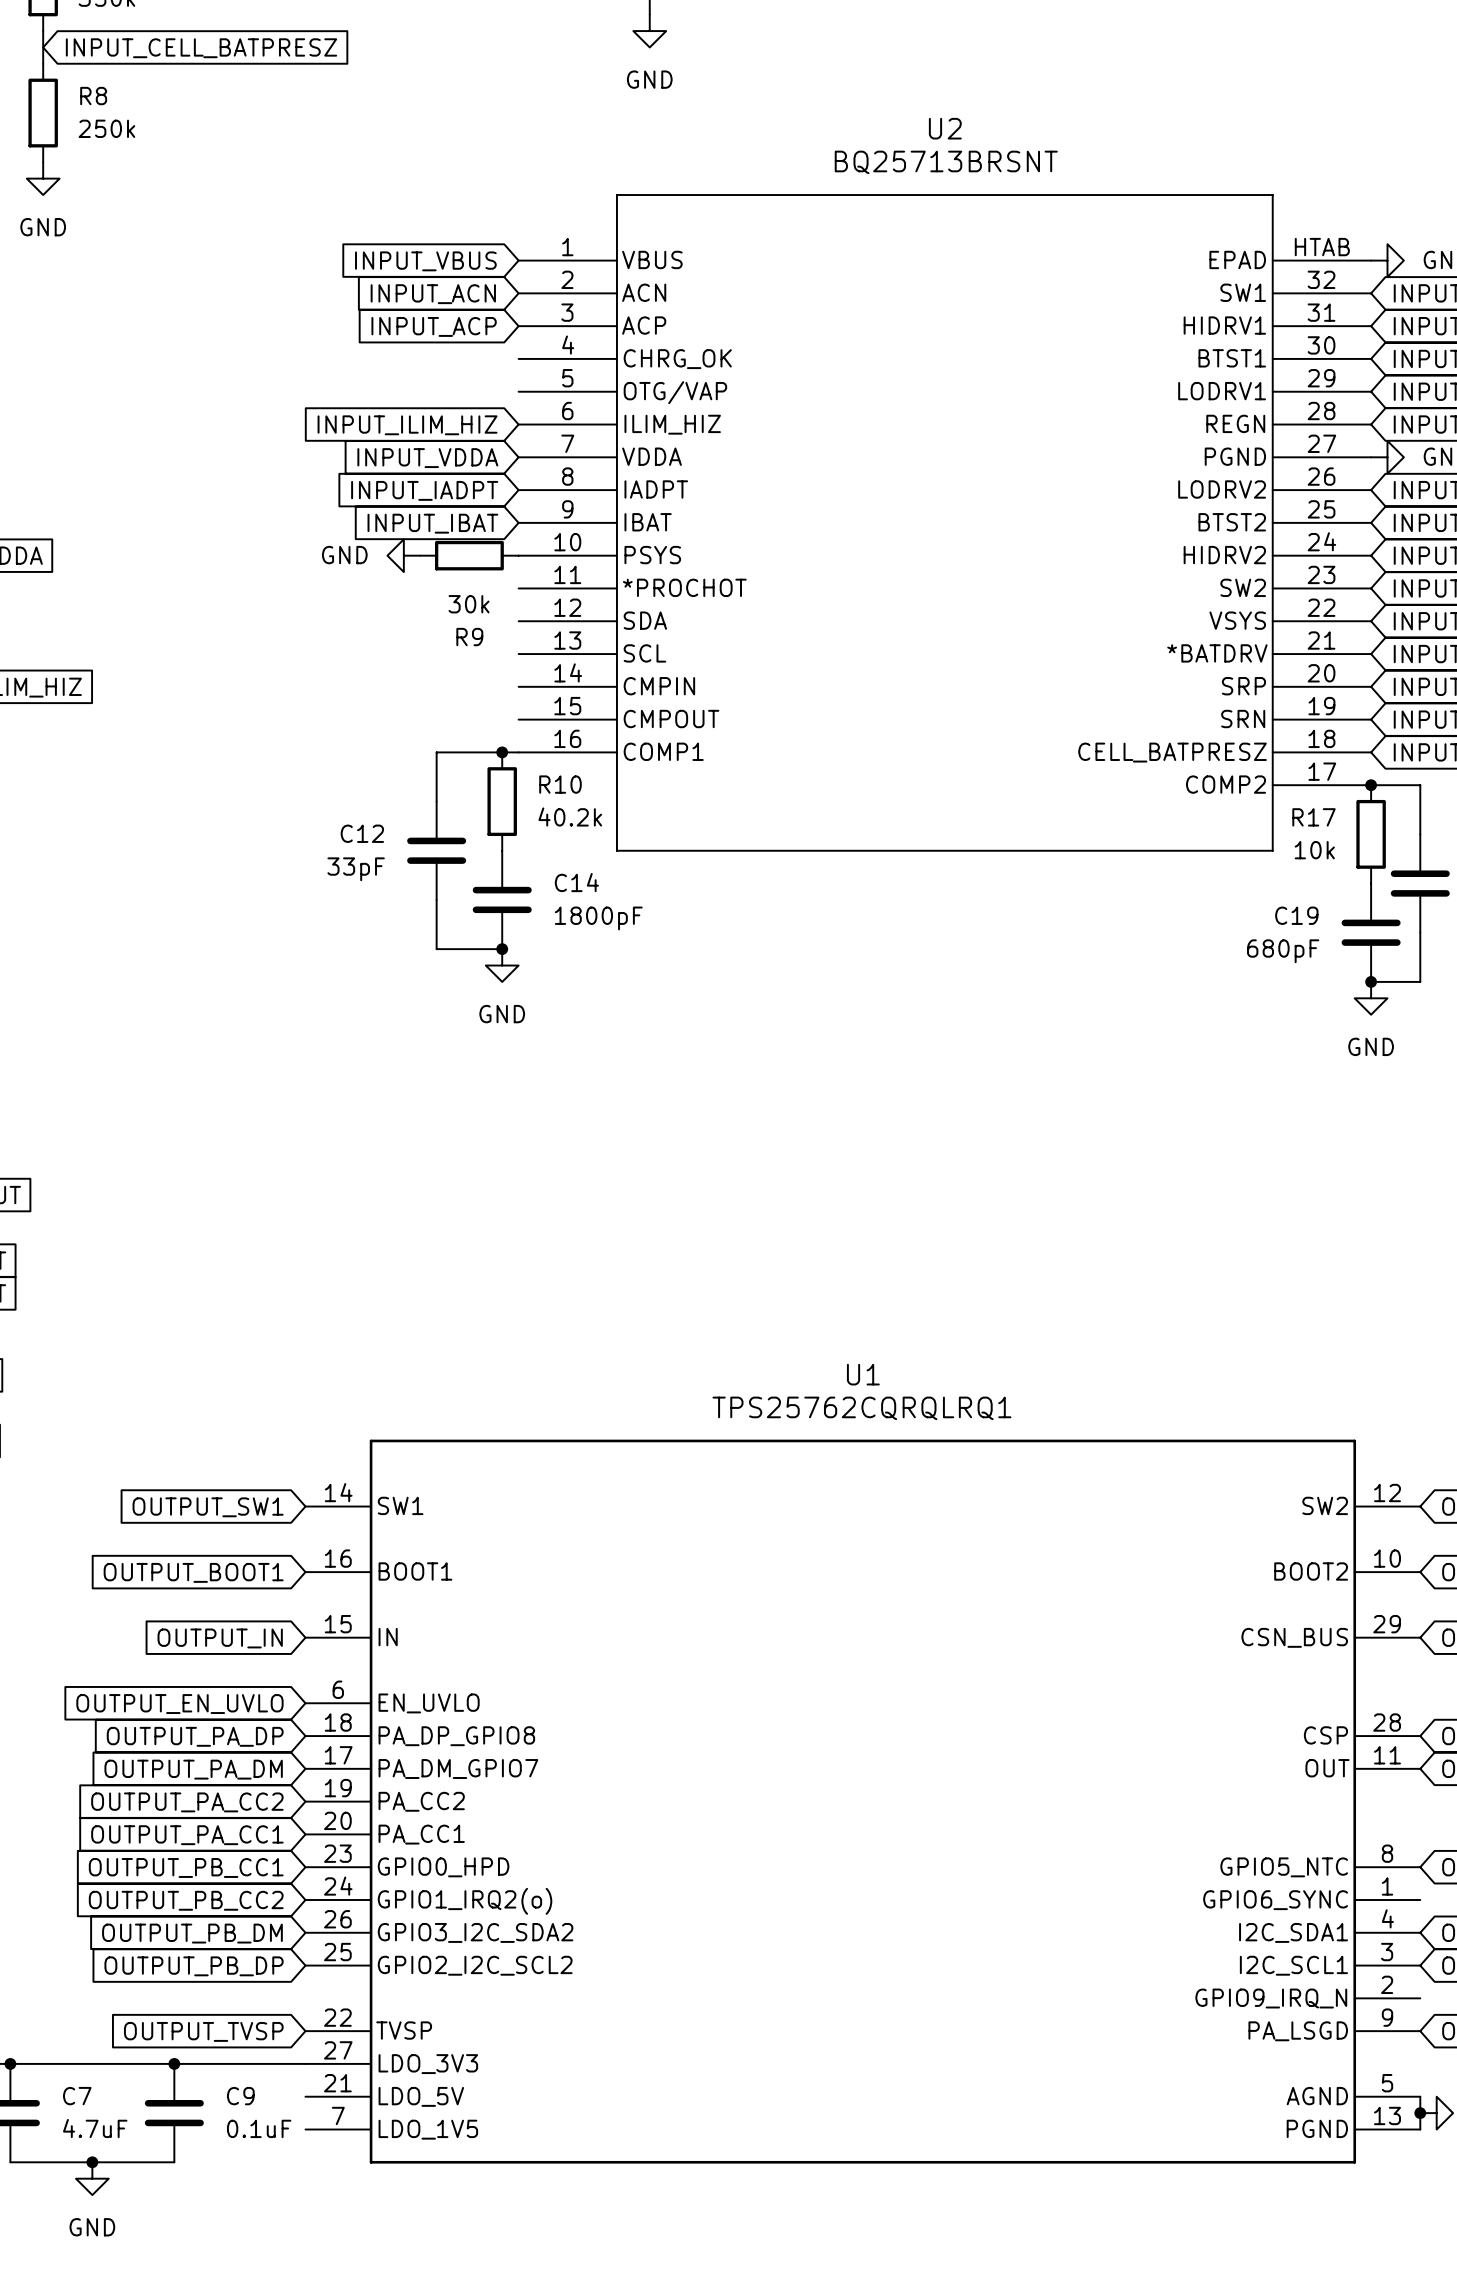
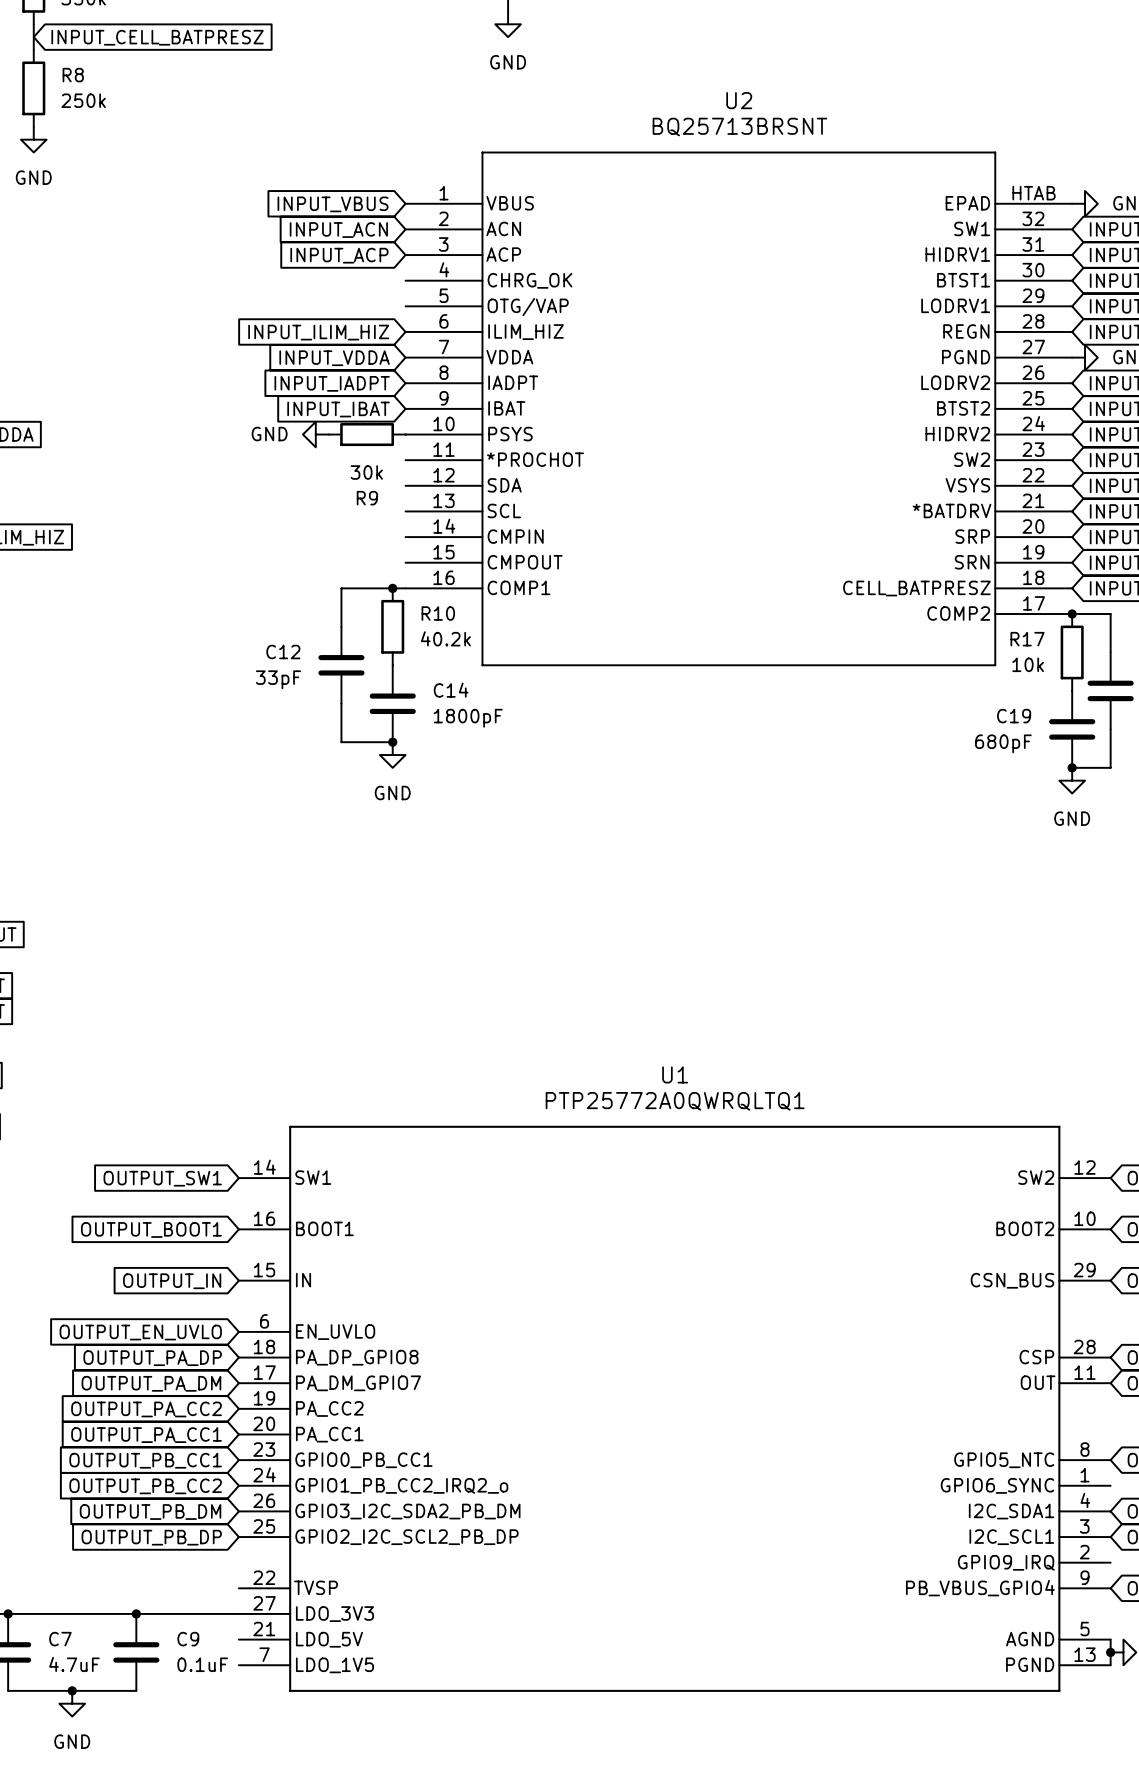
U1 value: TPS25762CQRQLRQ1 (861, 1408) -> PTP25772A0QWRQLTQ1 (675, 1101)
U1 pin name: GPIO0_HPD (443, 1867) -> GPIO0_PB_CC1 (363, 1460)
U1 pin name: GPIO1_IRQ2(o) (465, 1901) -> GPIO1_PB_CC2_IRQ2_o (401, 1485)
U1 pin name: GPIO3_I2C_SDA2 (475, 1932) -> GPIO3_I2C_SDA2_PB_DM (407, 1511)
U1 pin name: GPIO2_I2C_SCL2 (475, 1965) -> GPIO2_I2C_SCL2_PB_DP (406, 1537)
U1 pin name: GPIO9_IRQ_N (1271, 1998) -> GPIO9_IRQ (1006, 1562)
global label: OUTPUT_TVSP (203, 2031) -> none
U1 pin name: PA_LSGD (1298, 2031) -> PB_VBUS_GPIO4 (980, 1588)

